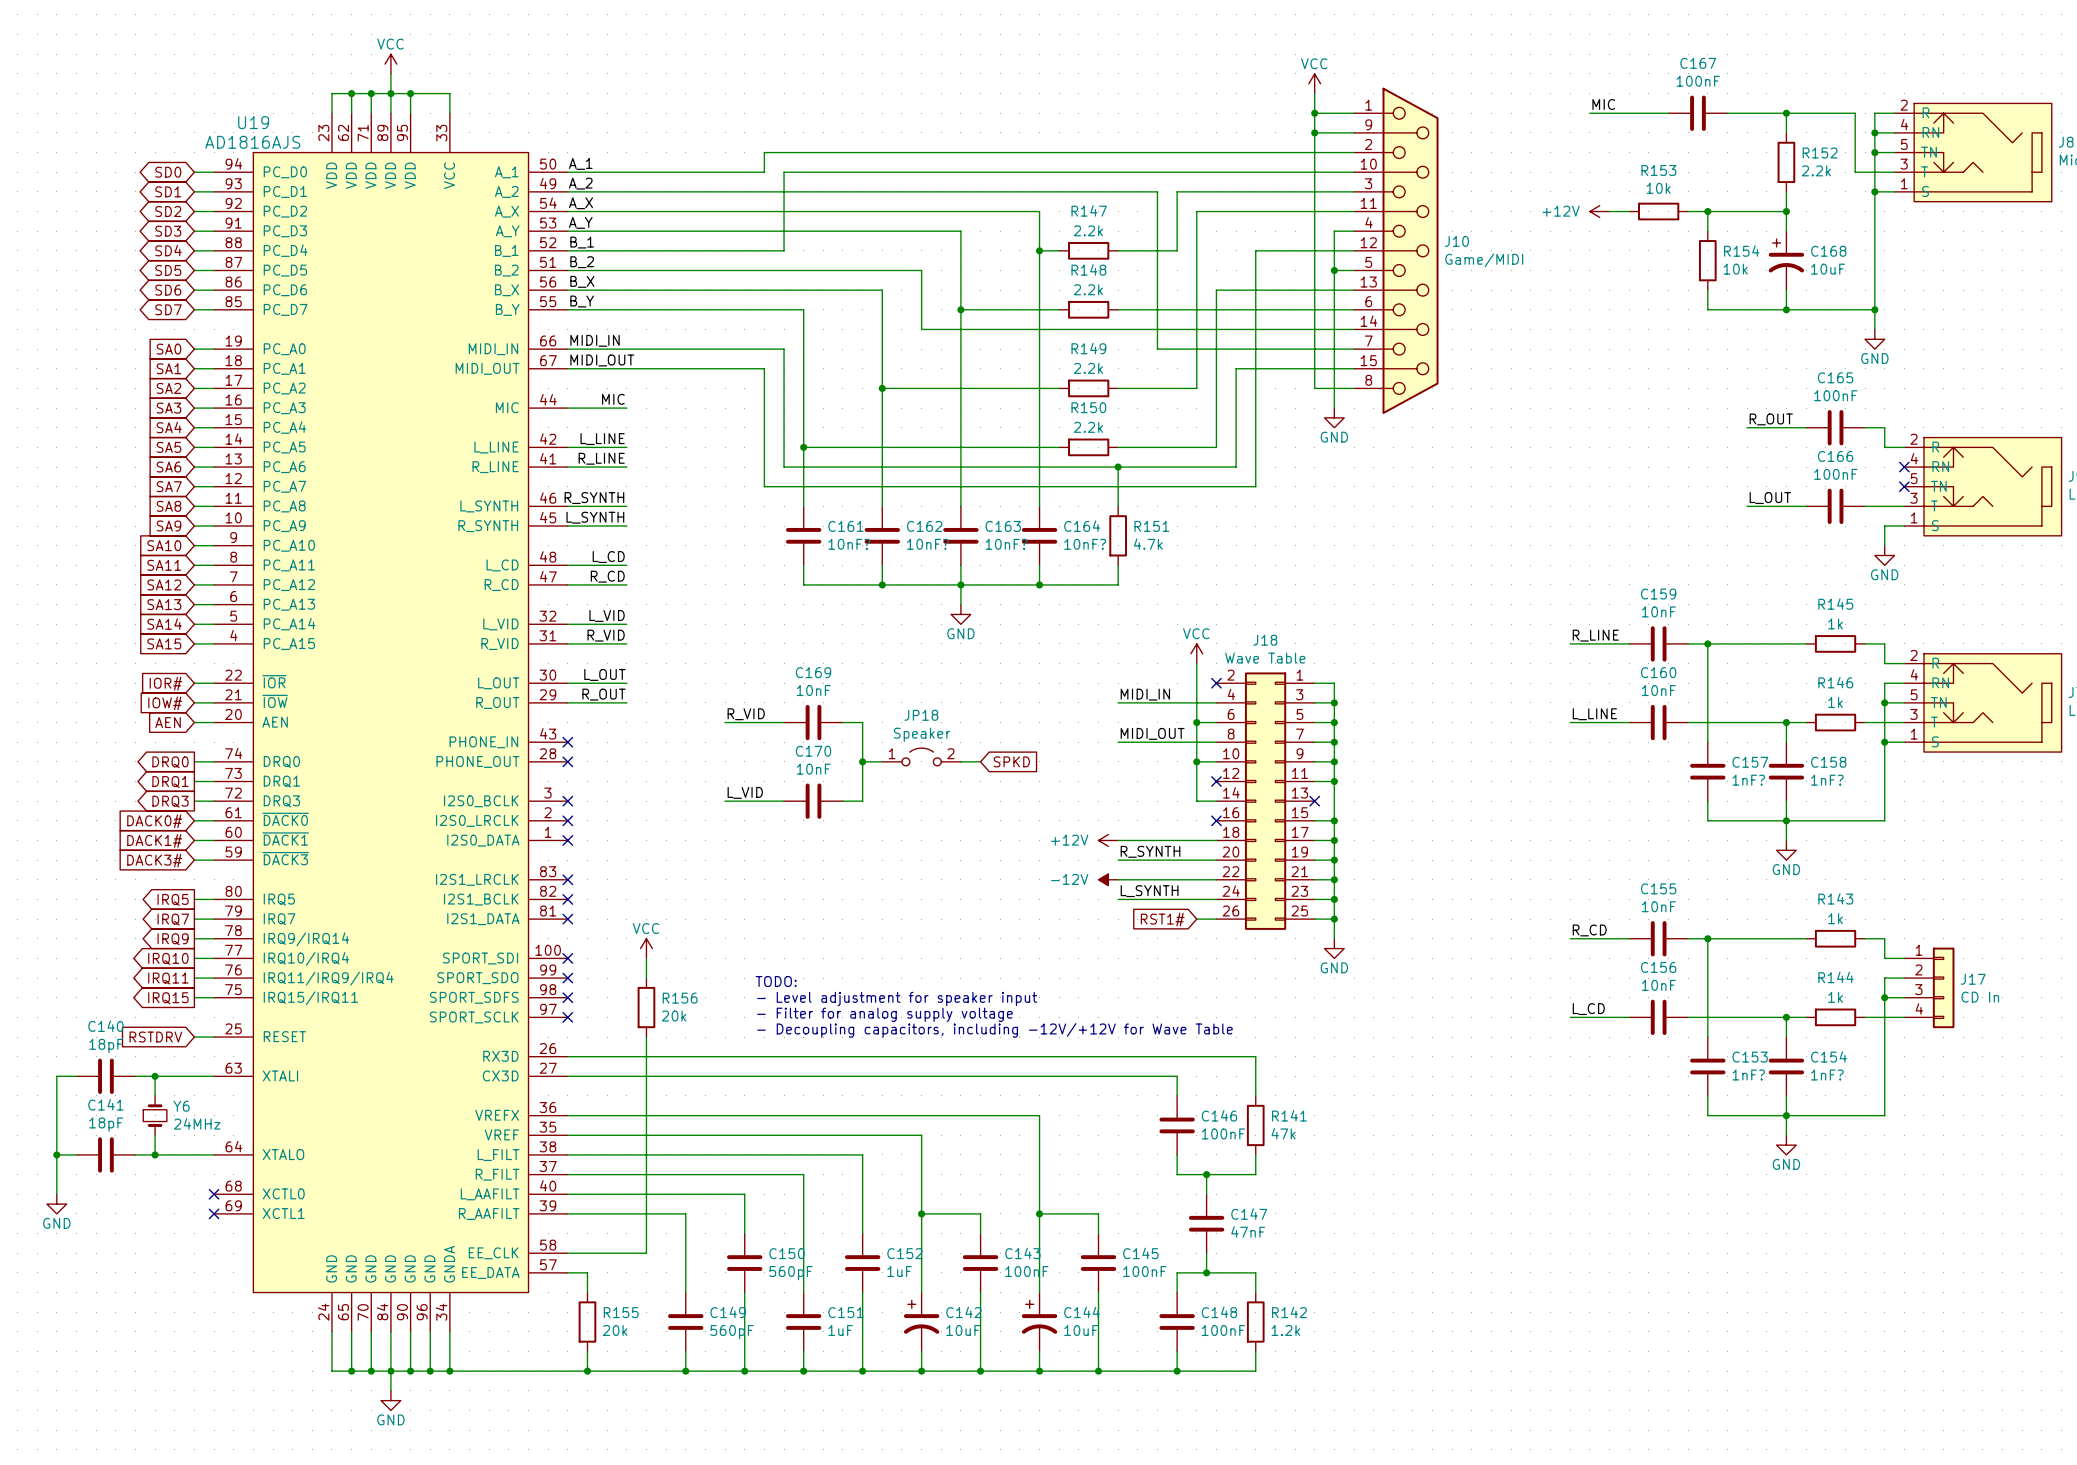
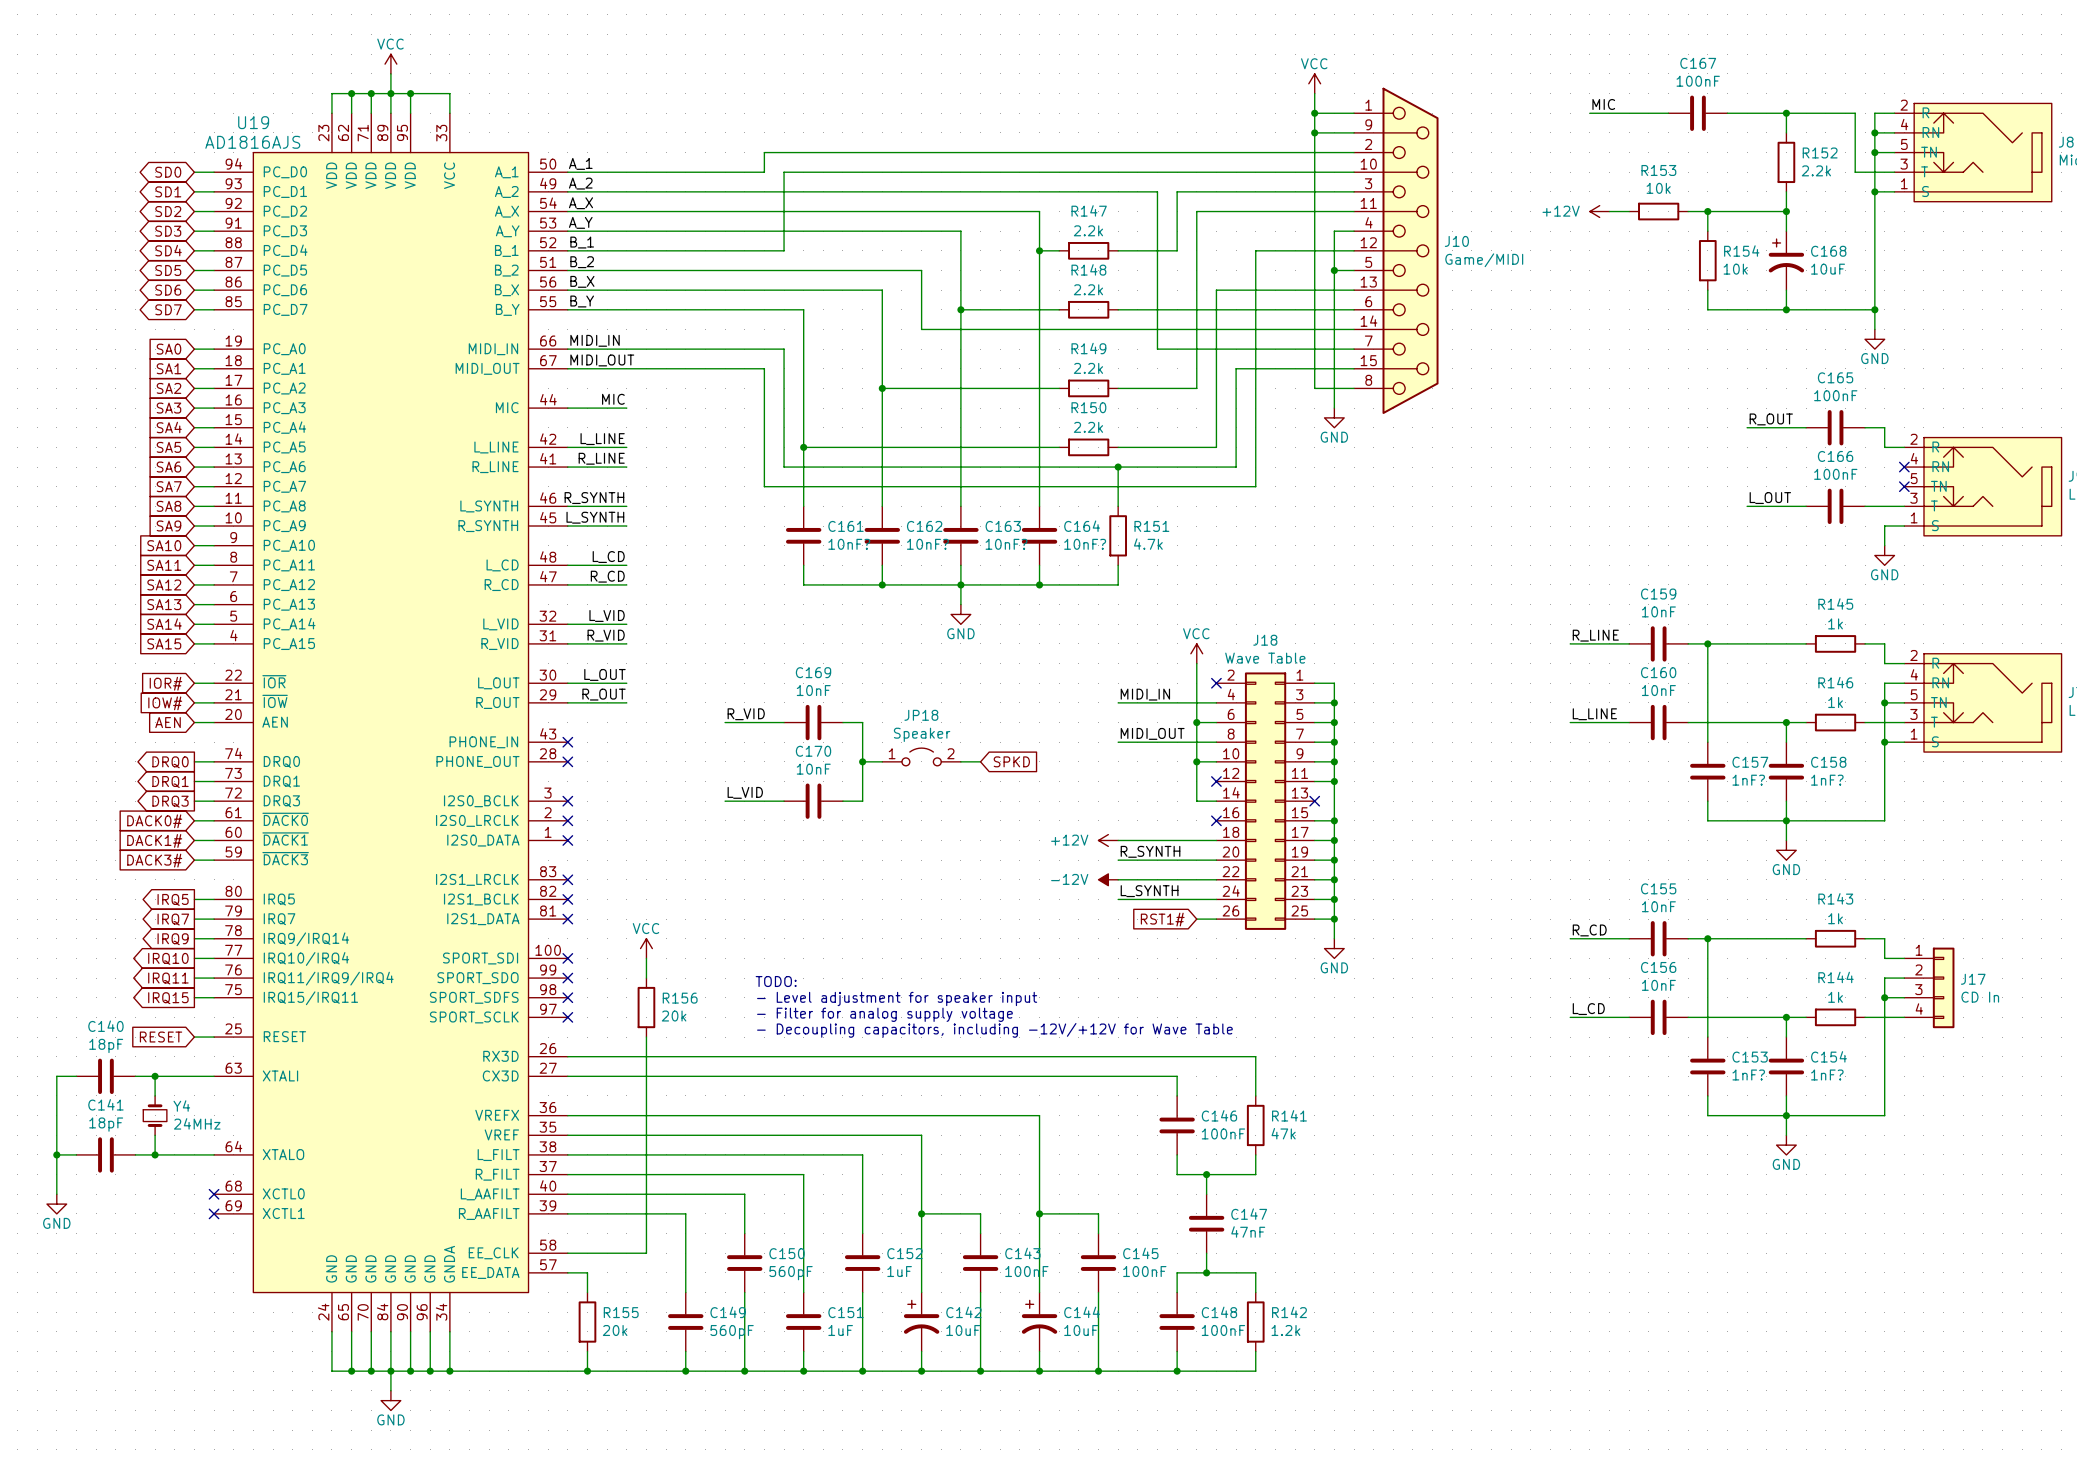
global label: RSTDRV (155, 1037) -> RESET (161, 1037)
Y6 name: Y6 (181, 1106) -> Y4 (181, 1106)

